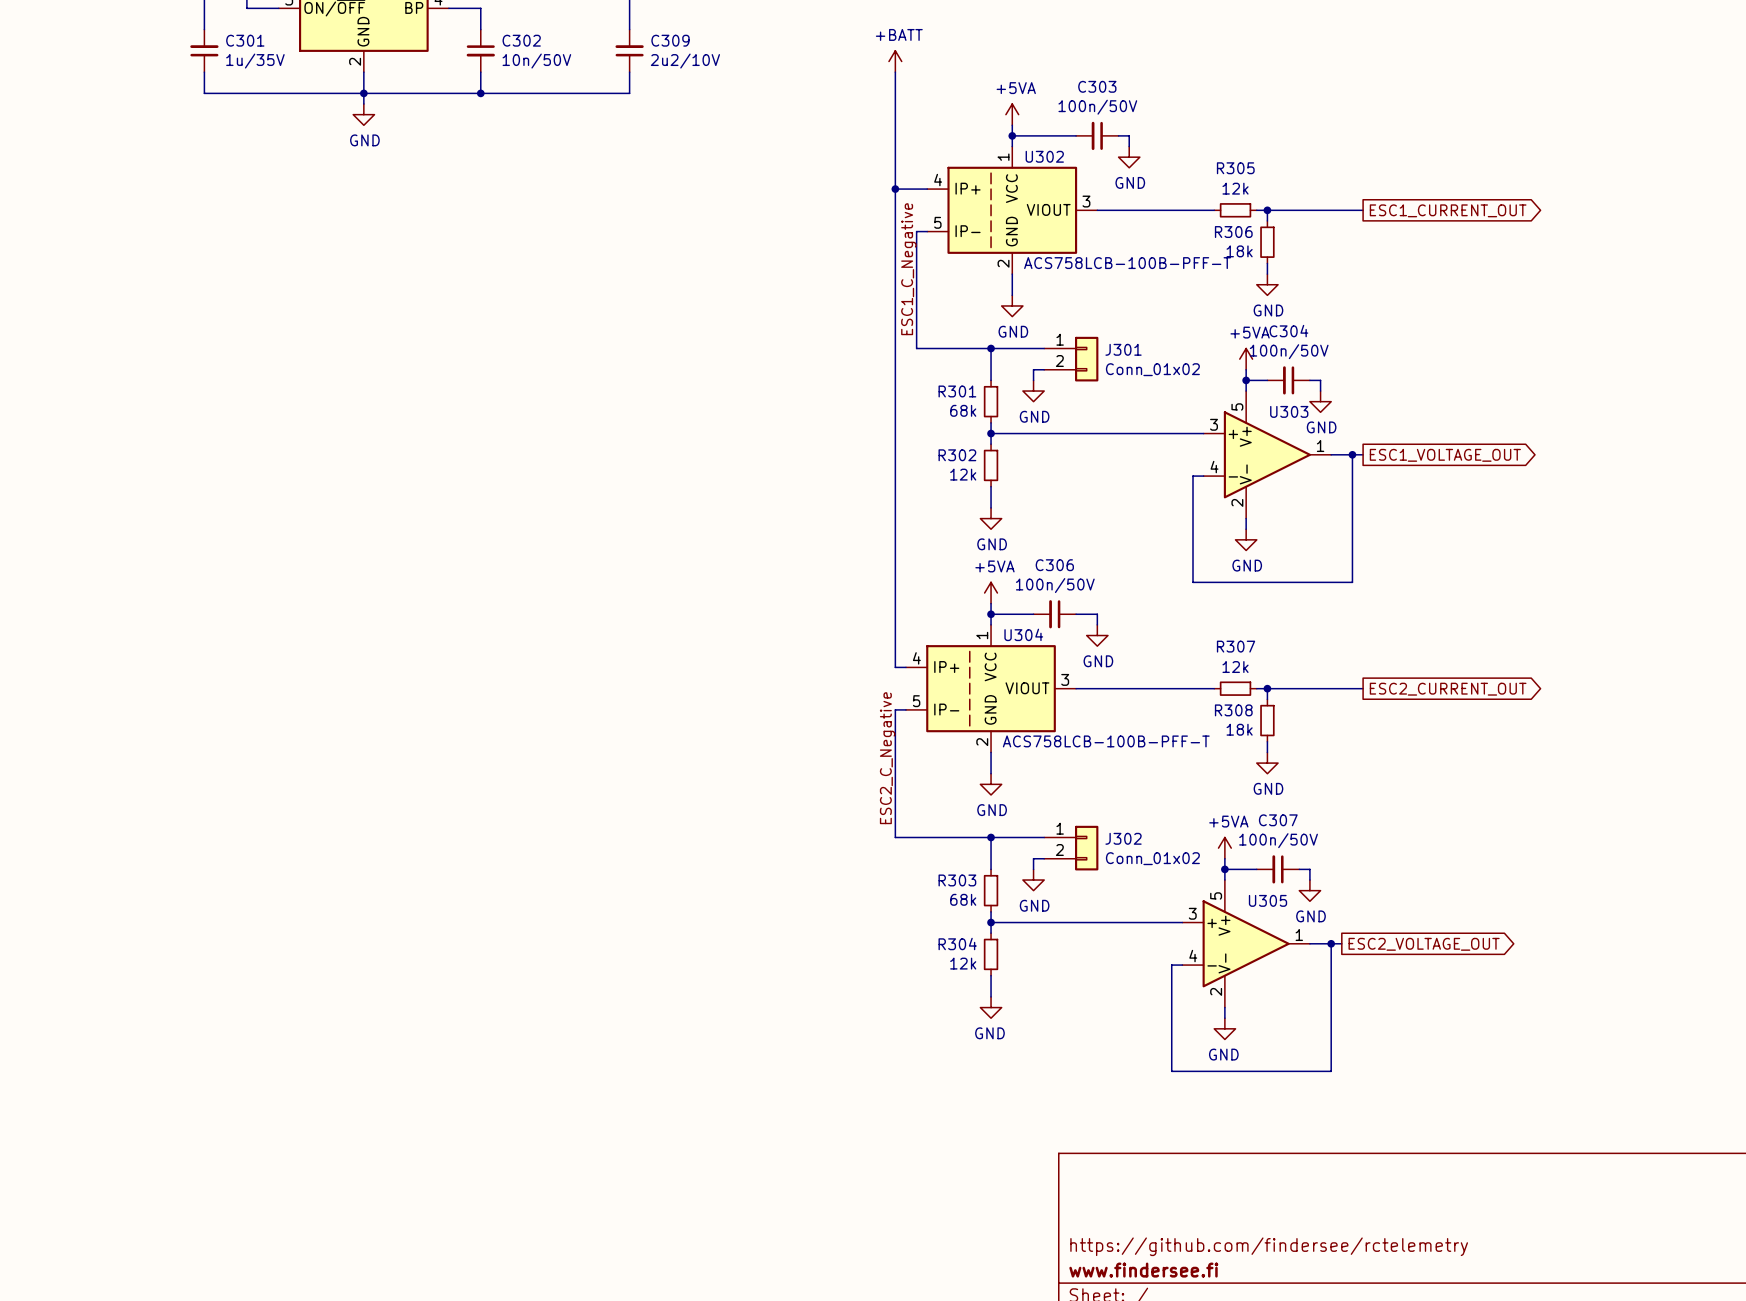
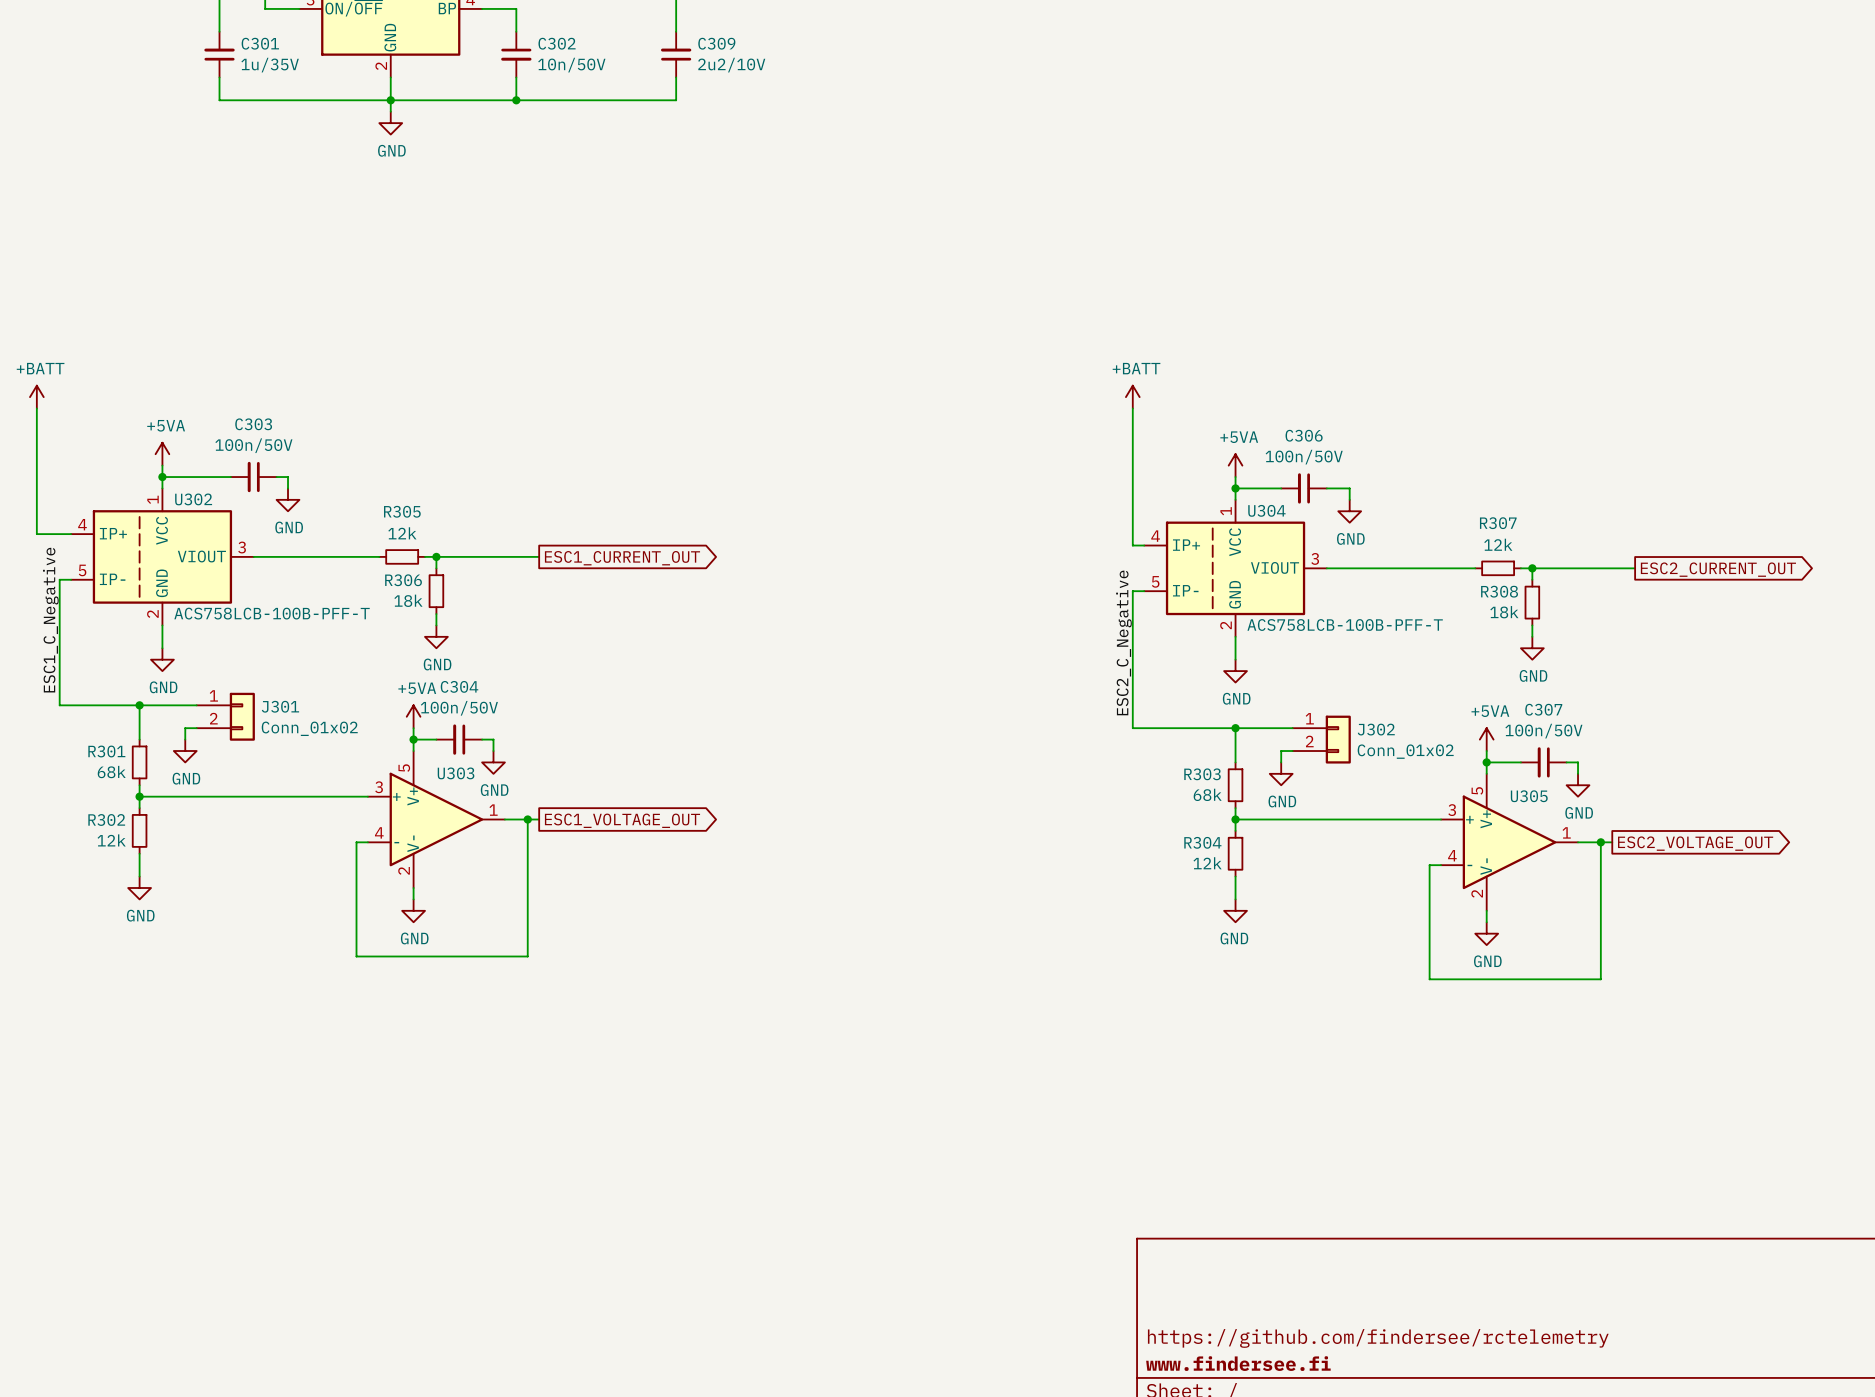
power symbol: +BATT (895, 61) -> none
wire: (895, 72) (895, 667) (905, 667) -> none
power symbol: +5VA (1012, 114) -> none
wire: (1012, 125) (1012, 146) -> none
wire: (1012, 135) (1076, 135) -> none
junction: (1012, 135) -> none
C303 position: (1097, 135) -> (253, 477)
wire: (1118, 135) (1129, 135) (1129, 146) -> none
power symbol: GND (1129, 157) -> none
wire: (895, 189) (927, 189) -> none
junction: (895, 189) -> none
U302 position: (1012, 210) -> (162, 556)
wire: (1097, 210) (1214, 210) -> none
R305 position: (1235, 210) -> (402, 556)
wire: (1256, 210) (1363, 210) -> none
wire: (1267, 210) (1267, 220) -> none
junction: (1267, 210) -> none
global label: ESC1_CURRENT_OUT (1448, 210) -> none
wire: (927, 231) (916, 231) (916, 348) (1044, 348) -> none
R306 position: (1267, 242) -> (436, 591)
wire: (1267, 263) (1267, 274) -> none
label: ESC1_C_Negative (908, 269) -> none
wire: (1012, 274) (1012, 295) -> none
power symbol: GND (1267, 284) -> none
power symbol: GND (1012, 305) -> none
wire: (991, 348) (991, 380) -> none
junction: (991, 348) -> none
J301 position: (1071, 359) -> (225, 716)
power symbol: +5VA (1246, 359) -> none
power symbol: none -> +BATT (36, 397)
wire: (1044, 369) (1033, 369) (1033, 380) -> none
power symbol: none -> +BATT (1132, 397)
wire: (1246, 369) (1246, 391) -> (1235, 477) (1235, 499)
wire: none -> (36, 408) (36, 534) (71, 534)
wire: none -> (1132, 408) (1132, 545) (1144, 545)
wire: (1246, 380) (1267, 380) -> none
junction: (1246, 380) -> none
C304 position: (1288, 380) -> (459, 739)
wire: (1309, 380) (1320, 380) (1320, 391) -> none
power symbol: GND (1033, 391) -> none
R301 position: (991, 401) -> (139, 762)
power symbol: GND (1320, 401) -> none
power symbol: none -> +5VA (162, 454)
wire: (991, 422) (991, 444) -> none
wire: none -> (162, 465) (162, 488)
wire: (991, 433) (1203, 433) -> none
junction: (991, 433) -> none
power symbol: none -> +5VA (1235, 465)
wire: none -> (162, 477) (230, 477)
junction: none -> (162, 477)
wire: none -> (276, 477) (288, 477) (288, 488)
wire: none -> (1235, 488) (1281, 488)
junction: none -> (1235, 488)
U303 position: (1267, 454) -> (436, 819)
wire: (1331, 454) (1363, 454) -> none
wire: (1352, 454) (1352, 582) (1193, 582) (1193, 476) (1203, 476) -> none
junction: (1352, 454) -> none
global label: ESC1_VOLTAGE_OUT (1445, 455) -> none
power symbol: none -> GND (288, 499)
R302 position: (991, 465) -> (139, 830)
power symbol: none -> GND (1349, 511)
wire: (991, 486) (991, 507) -> none
wire: none -> (253, 556) (379, 556)
wire: none -> (425, 556) (539, 556)
wire: none -> (436, 556) (436, 568)
junction: none -> (436, 556)
power symbol: GND (991, 518) -> none
wire: (1246, 518) (1246, 529) -> (1532, 568) (1532, 579)
global label: none -> ESC1_CURRENT_OUT (622, 558)
wire: none -> (1326, 568) (1475, 568)
wire: none -> (1520, 568) (1635, 568)
junction: none -> (1532, 568)
global label: none -> ESC2_CURRENT_OUT (1718, 569)
wire: none -> (71, 579) (59, 579) (59, 705) (196, 705)
power symbol: GND (1246, 539) -> none
wire: none -> (1144, 591) (1132, 591) (1132, 728) (1292, 728)
wire: none -> (436, 614) (436, 625)
label: none -> ESC1_C_Negative (50, 620)
wire: none -> (162, 625) (162, 648)
power symbol: none -> GND (436, 636)
power symbol: +5VA (991, 593) -> none
label: none -> ESC2_C_Negative (1123, 642)
wire: (991, 603) (991, 624) -> (1235, 636) (1235, 659)
power symbol: none -> GND (1532, 648)
power symbol: none -> GND (162, 659)
wire: (991, 614) (1033, 614) -> none
junction: (991, 614) -> none
C306 position: (1054, 614) -> (1304, 488)
wire: (1076, 614) (1097, 614) (1097, 624) -> none
power symbol position: GND (1097, 635) -> GND (1235, 671)
wire: none -> (139, 705) (139, 739)
junction: none -> (139, 705)
power symbol: none -> +5VA (413, 716)
wire: none -> (196, 728) (185, 728) (185, 739)
wire: none -> (413, 728) (413, 751)
wire: none -> (1235, 728) (1235, 762)
junction: none -> (1235, 728)
wire: none -> (413, 739) (436, 739)
junction: none -> (413, 739)
wire: none -> (482, 739) (493, 739) (493, 751)
U304 position: (991, 688) -> (1235, 568)
wire: (1076, 688) (1214, 688) -> none
R307 position: (1235, 688) -> (1498, 568)
wire: (1256, 688) (1363, 688) -> none
wire: (1267, 688) (1267, 699) -> (1532, 625) (1532, 636)
junction: (1267, 688) -> none
power symbol: none -> +5VA (1486, 739)
global label: ESC2_CURRENT_OUT (1448, 689) -> none
power symbol: none -> GND (185, 751)
wire: none -> (1292, 751) (1281, 751) (1281, 762)
wire: none -> (1486, 751) (1486, 773)
power symbol: none -> GND (493, 762)
wire: (905, 709) (895, 709) (895, 837) (1044, 837) -> none
wire: none -> (1486, 762) (1520, 762)
junction: none -> (1486, 762)
wire: none -> (1566, 762) (1578, 762) (1578, 773)
power symbol: none -> GND (1281, 773)
R308 position: (1267, 720) -> (1532, 602)
wire: none -> (139, 785) (139, 808)
power symbol: none -> GND (1578, 785)
wire: none -> (139, 796) (367, 796)
junction: none -> (139, 796)
wire: (1267, 741) (1267, 752) -> (1486, 910) (1486, 922)
wire: (991, 752) (991, 773) -> (1235, 808) (1235, 830)
label: ESC2_C_Negative (887, 758) -> none
wire: none -> (504, 819) (539, 819)
wire: none -> (527, 819) (527, 956) (356, 956) (356, 842) (367, 842)
junction: none -> (527, 819)
global label: none -> ESC1_VOLTAGE_OUT (622, 820)
wire: none -> (1235, 819) (1441, 819)
junction: none -> (1235, 819)
power symbol: GND (1267, 763) -> none
power symbol: GND (991, 784) -> none
wire: none -> (1578, 842) (1612, 842)
wire: none -> (1600, 842) (1600, 979) (1429, 979) (1429, 865) (1441, 865)
junction: none -> (1600, 842)
global label: none -> ESC2_VOLTAGE_OUT (1695, 843)
wire: none -> (139, 853) (139, 876)
power symbol: none -> GND (139, 888)
wire: none -> (413, 888) (413, 899)
wire: (991, 837) (991, 869) -> none
junction: (991, 837) -> none
power symbol: none -> GND (413, 910)
J302 position: (1071, 848) -> (1321, 739)
power symbol: none -> GND (1235, 910)
power symbol: +5VA (1224, 848) -> none
wire: (1044, 858) (1033, 858) (1033, 869) -> none
wire: (1224, 858) (1224, 880) -> (1235, 876) (1235, 899)
wire: (1224, 869) (1256, 869) -> none
junction: (1224, 869) -> none
C307 position: (1278, 869) -> (1543, 762)
wire: (1299, 869) (1309, 869) (1309, 880) -> none
power symbol: GND (1033, 880) -> none
R303 position: (991, 890) -> (1235, 785)
power symbol position: GND (1309, 890) -> GND (1486, 933)
wire: (991, 911) (991, 933) -> none
wire: (991, 922) (1182, 922) -> none
junction: (991, 922) -> none
U305 position: (1246, 943) -> (1509, 842)
wire: (1309, 943) (1341, 943) -> none
wire: (1331, 943) (1331, 1071) (1171, 1071) (1171, 965) (1182, 965) -> none
junction: (1331, 943) -> none
global label: ESC2_VOLTAGE_OUT (1424, 944) -> none
R304 position: (991, 954) -> (1235, 853)
wire: (991, 975) (991, 996) -> none
power symbol: GND (991, 1007) -> none
wire: (1224, 1007) (1224, 1018) -> none
power symbol: GND (1224, 1028) -> none

